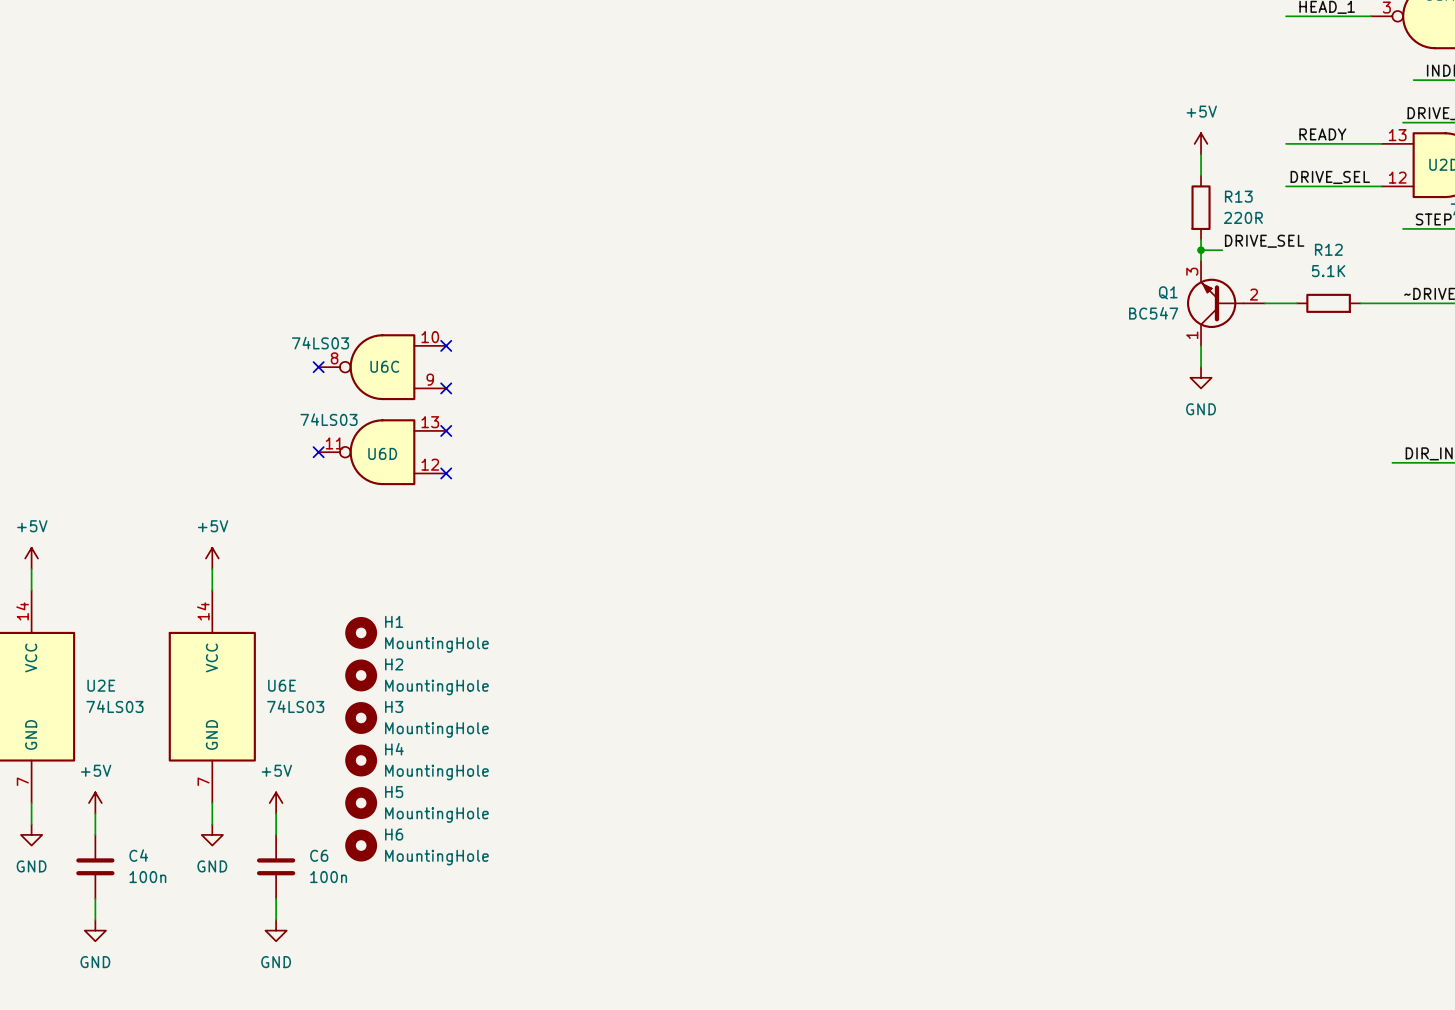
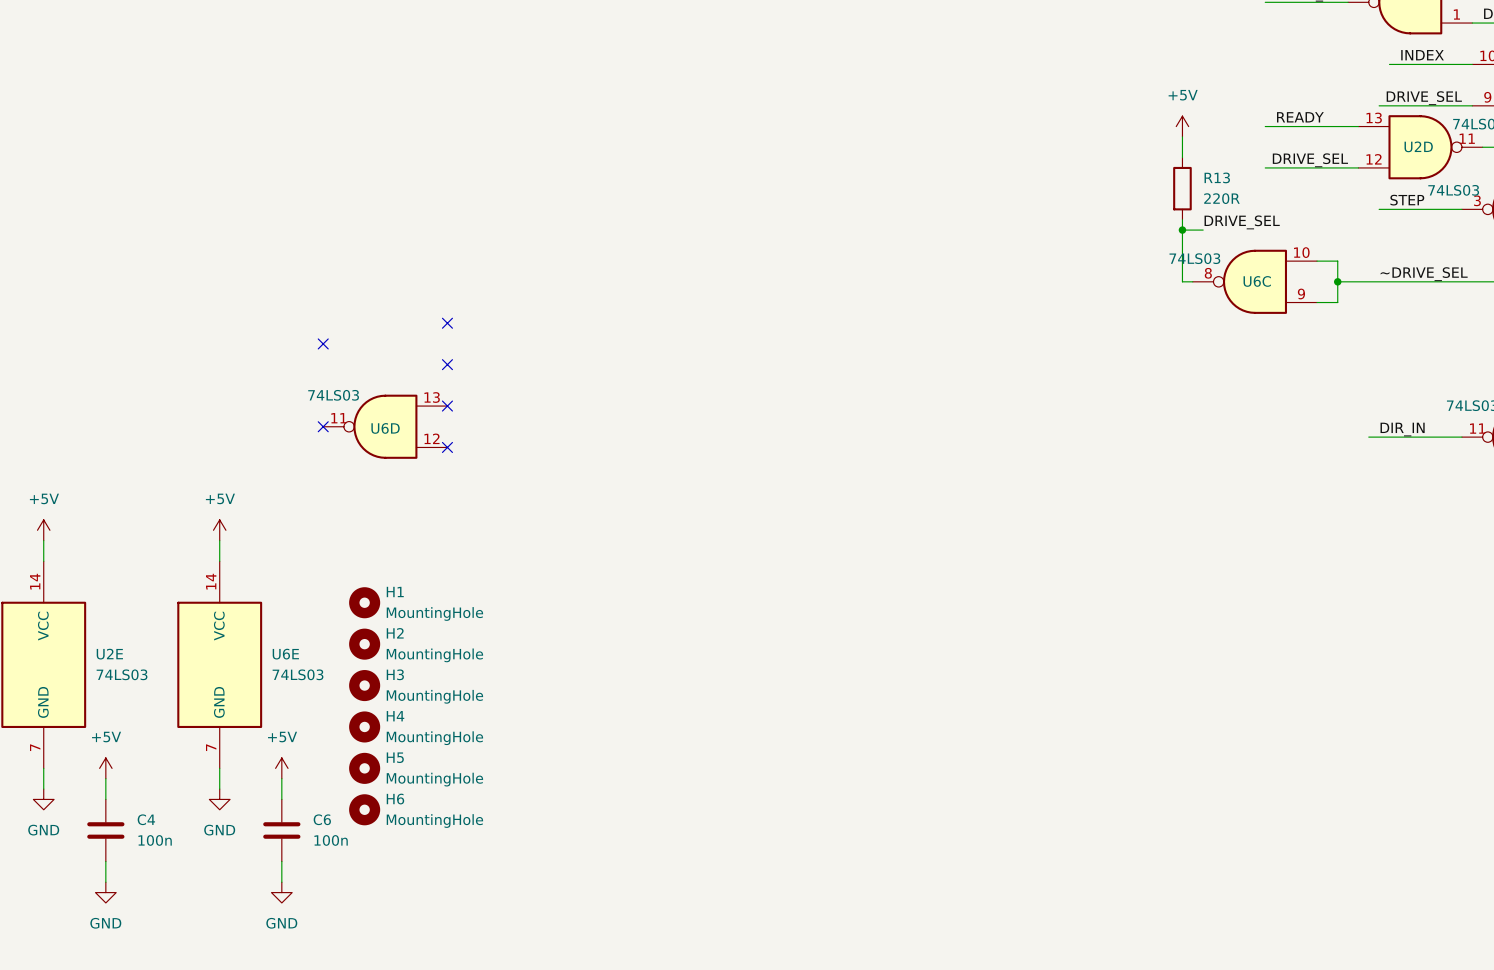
wire: none -> (1182, 240) (1182, 281) (1192, 281)
wire: none -> (1317, 261) (1337, 261) (1337, 302) (1317, 302)
Q1: BC547 (1225, 303) -> none
R12: 5.1K (1328, 303) -> none
junction: none -> (1337, 281)
wire: (1201, 345) (1201, 367) -> none
U6C position: (382, 367) -> (1254, 281)
power symbol: GND (1201, 377) -> none

